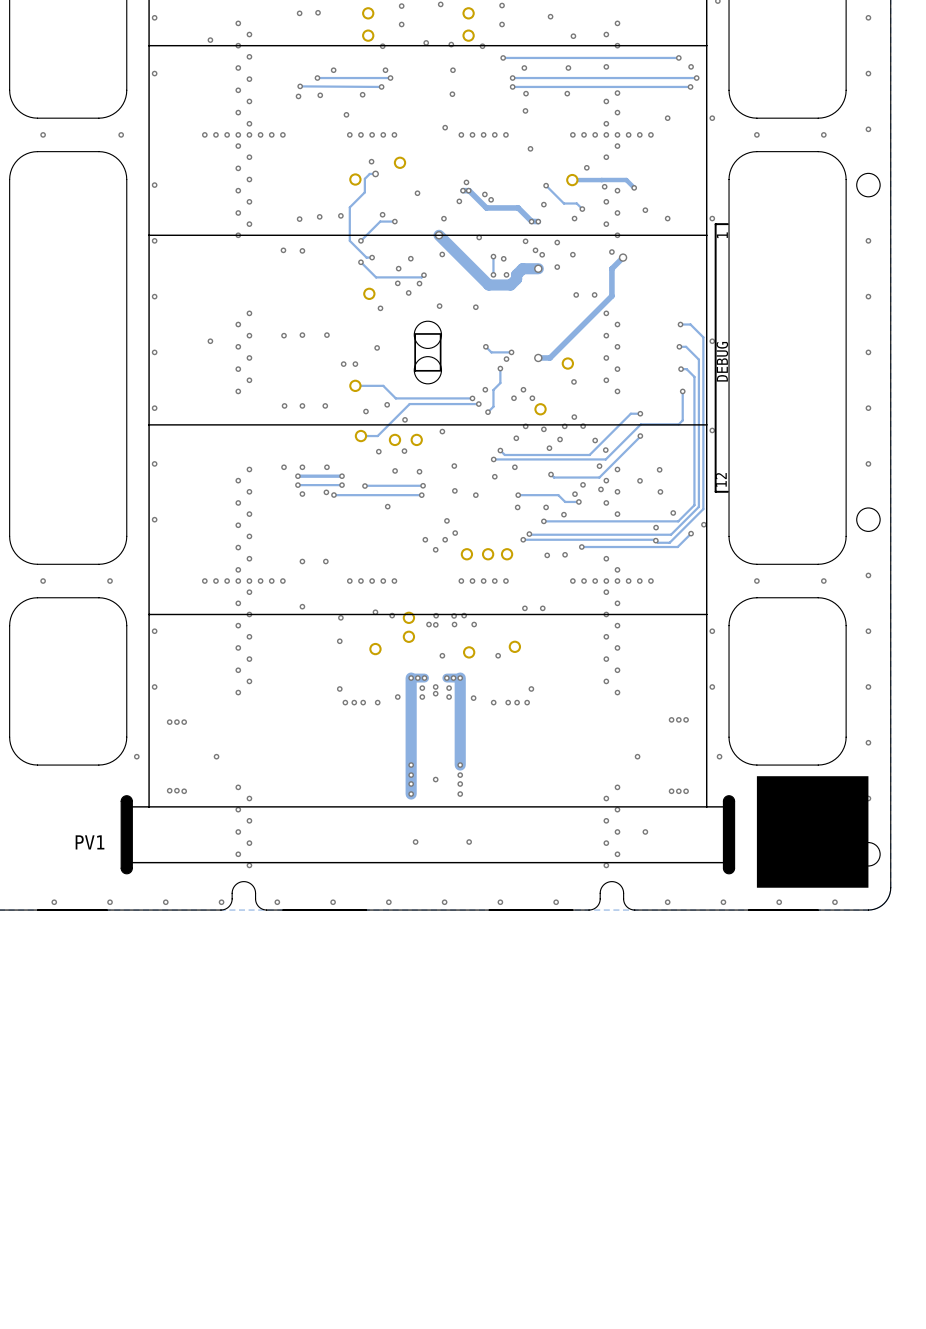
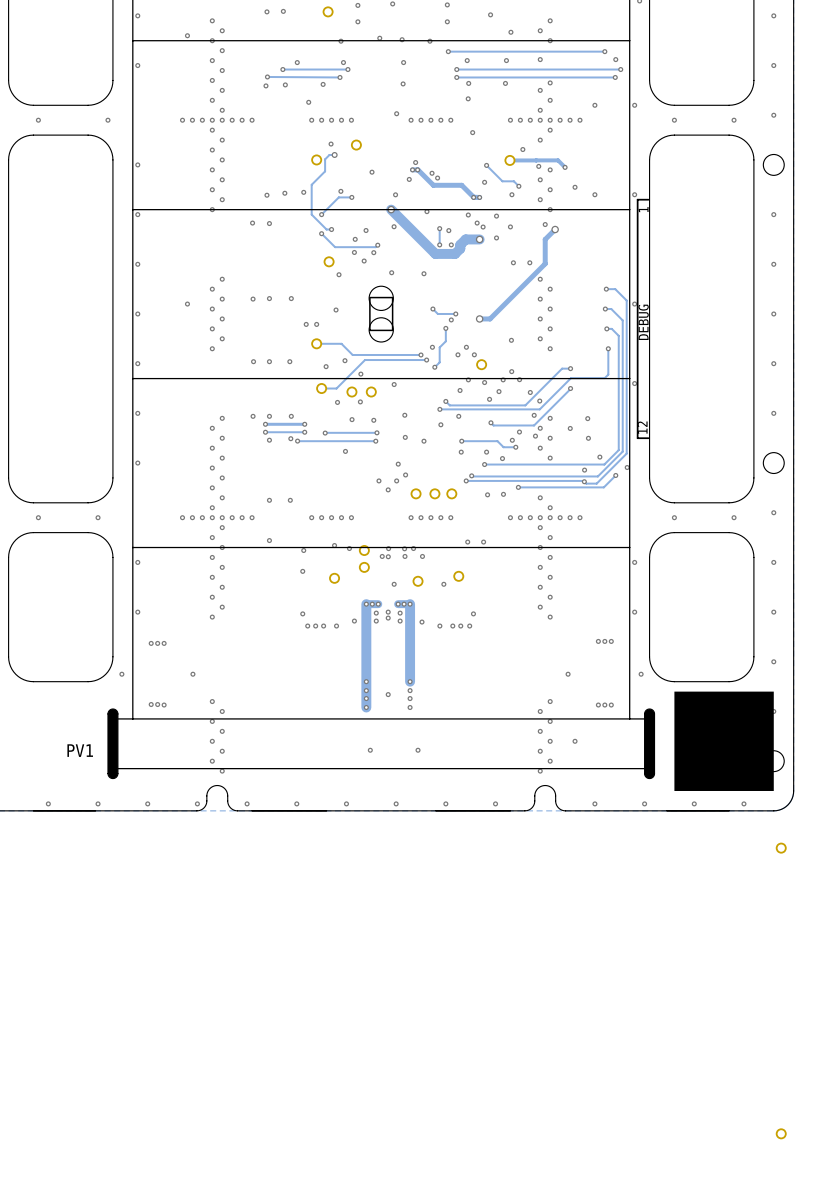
part: (468, 13) -> none
part: (368, 35) -> none
part: (468, 35) -> none
part: (567, 363) -> none
part: none -> (781, 848)
part: none -> (781, 1133)

